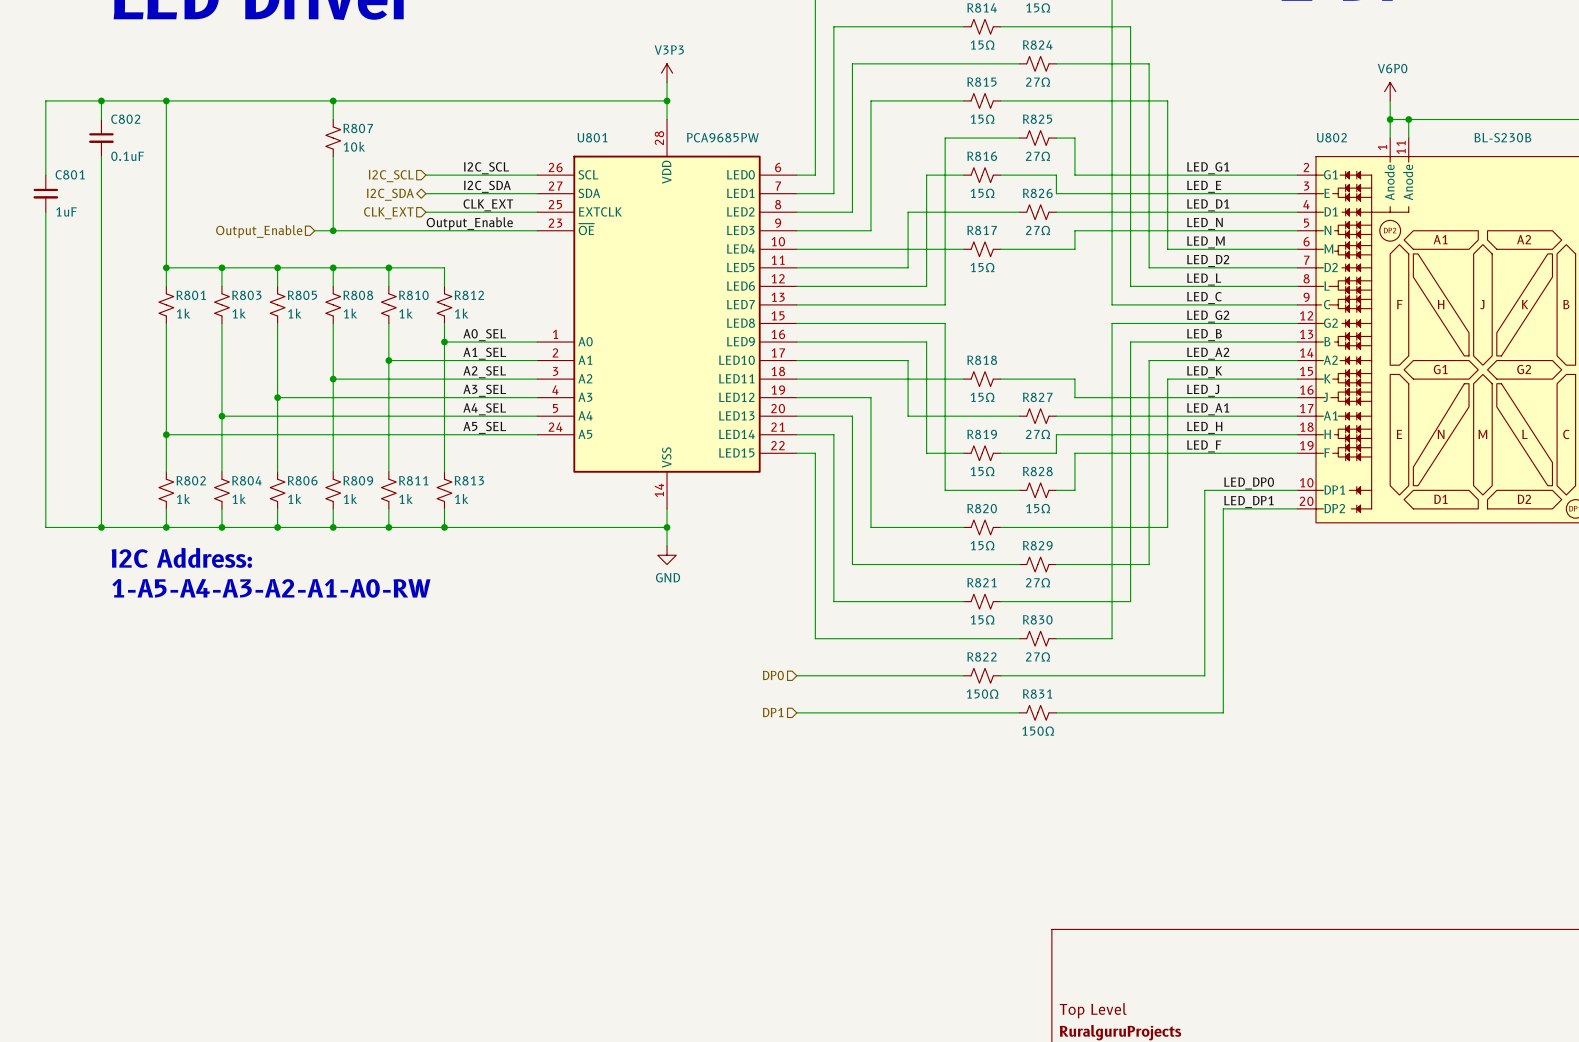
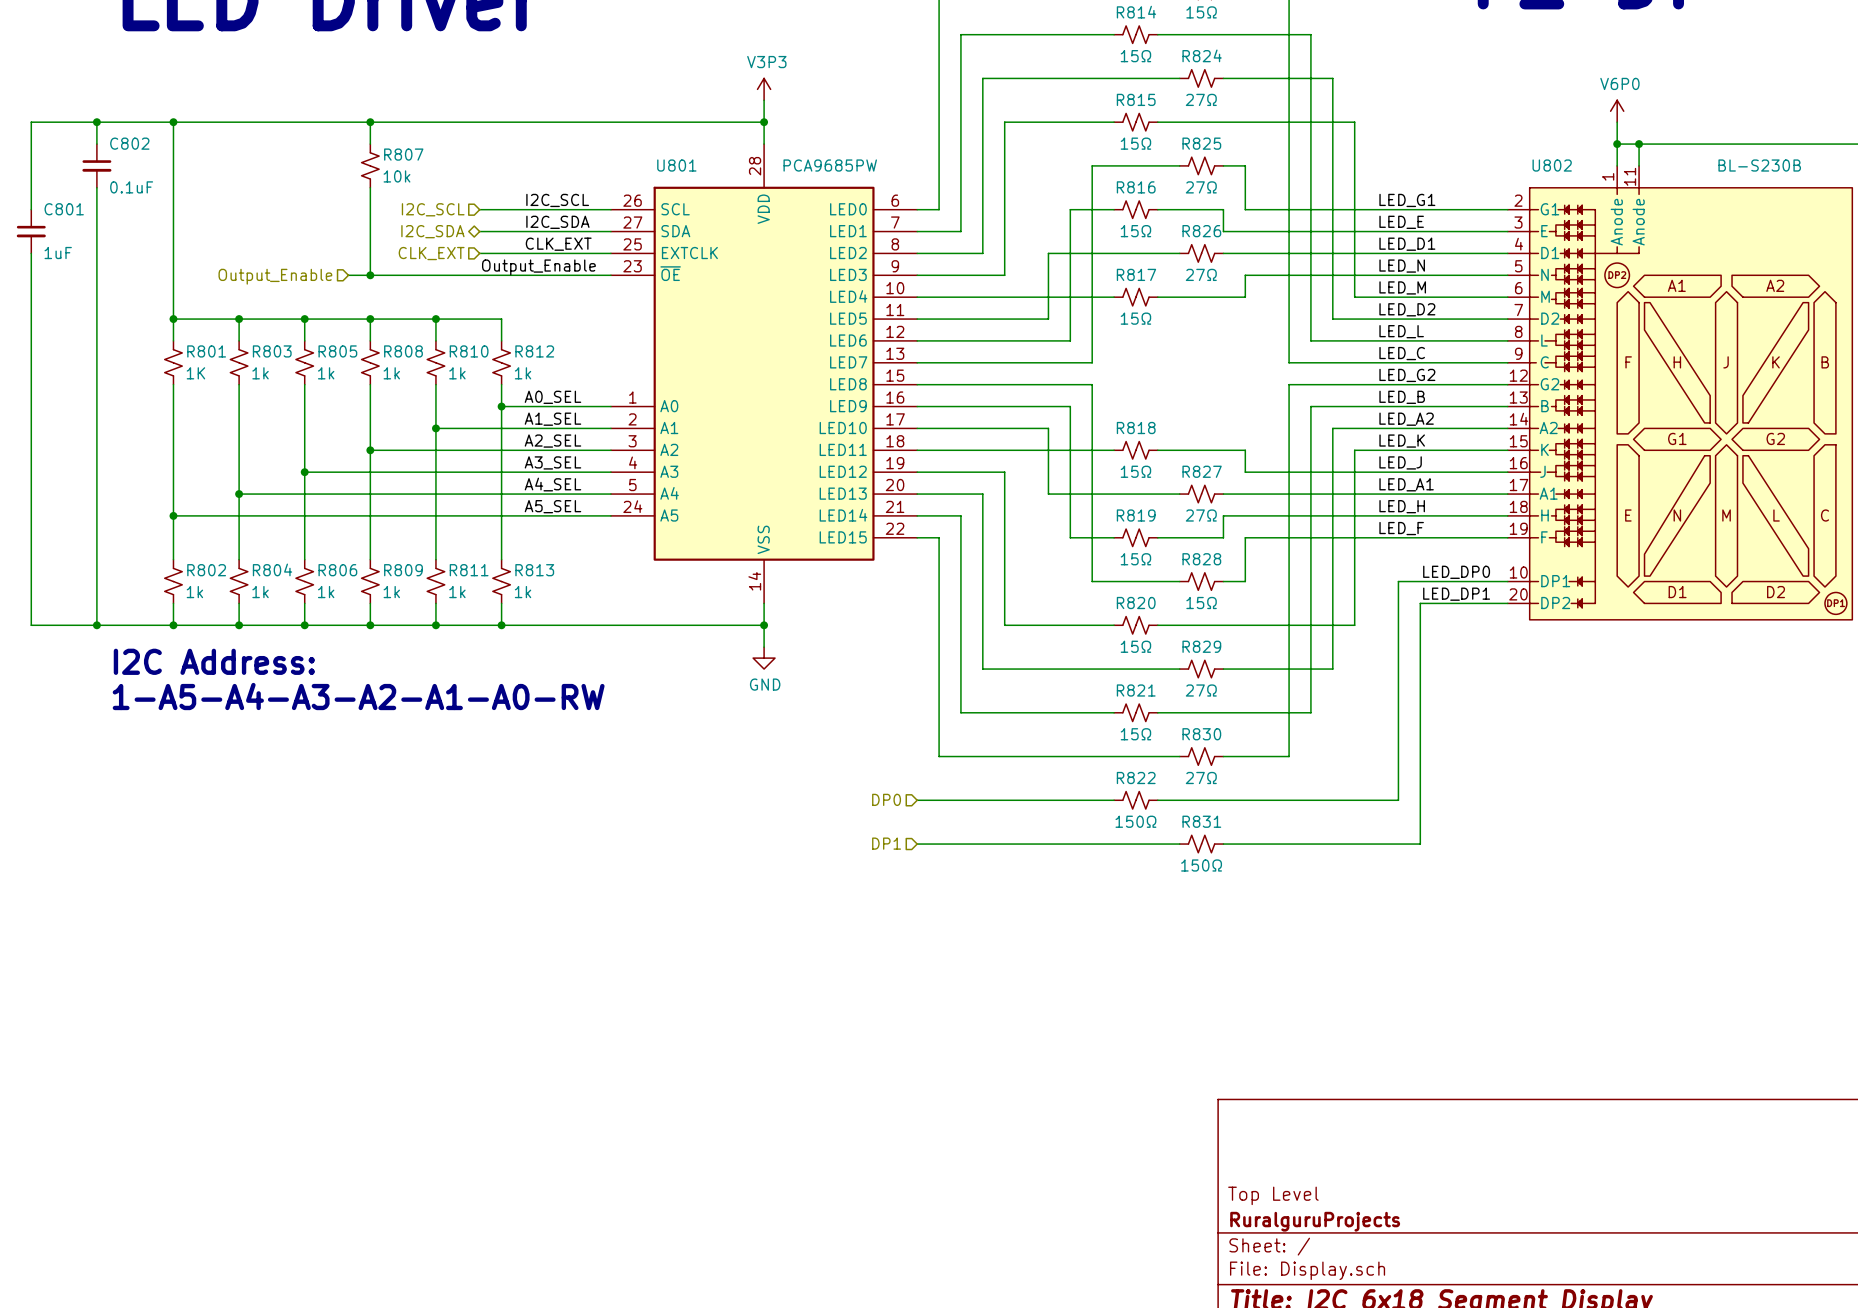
R801 value: 1k (183, 313) -> 1K (195, 373)

